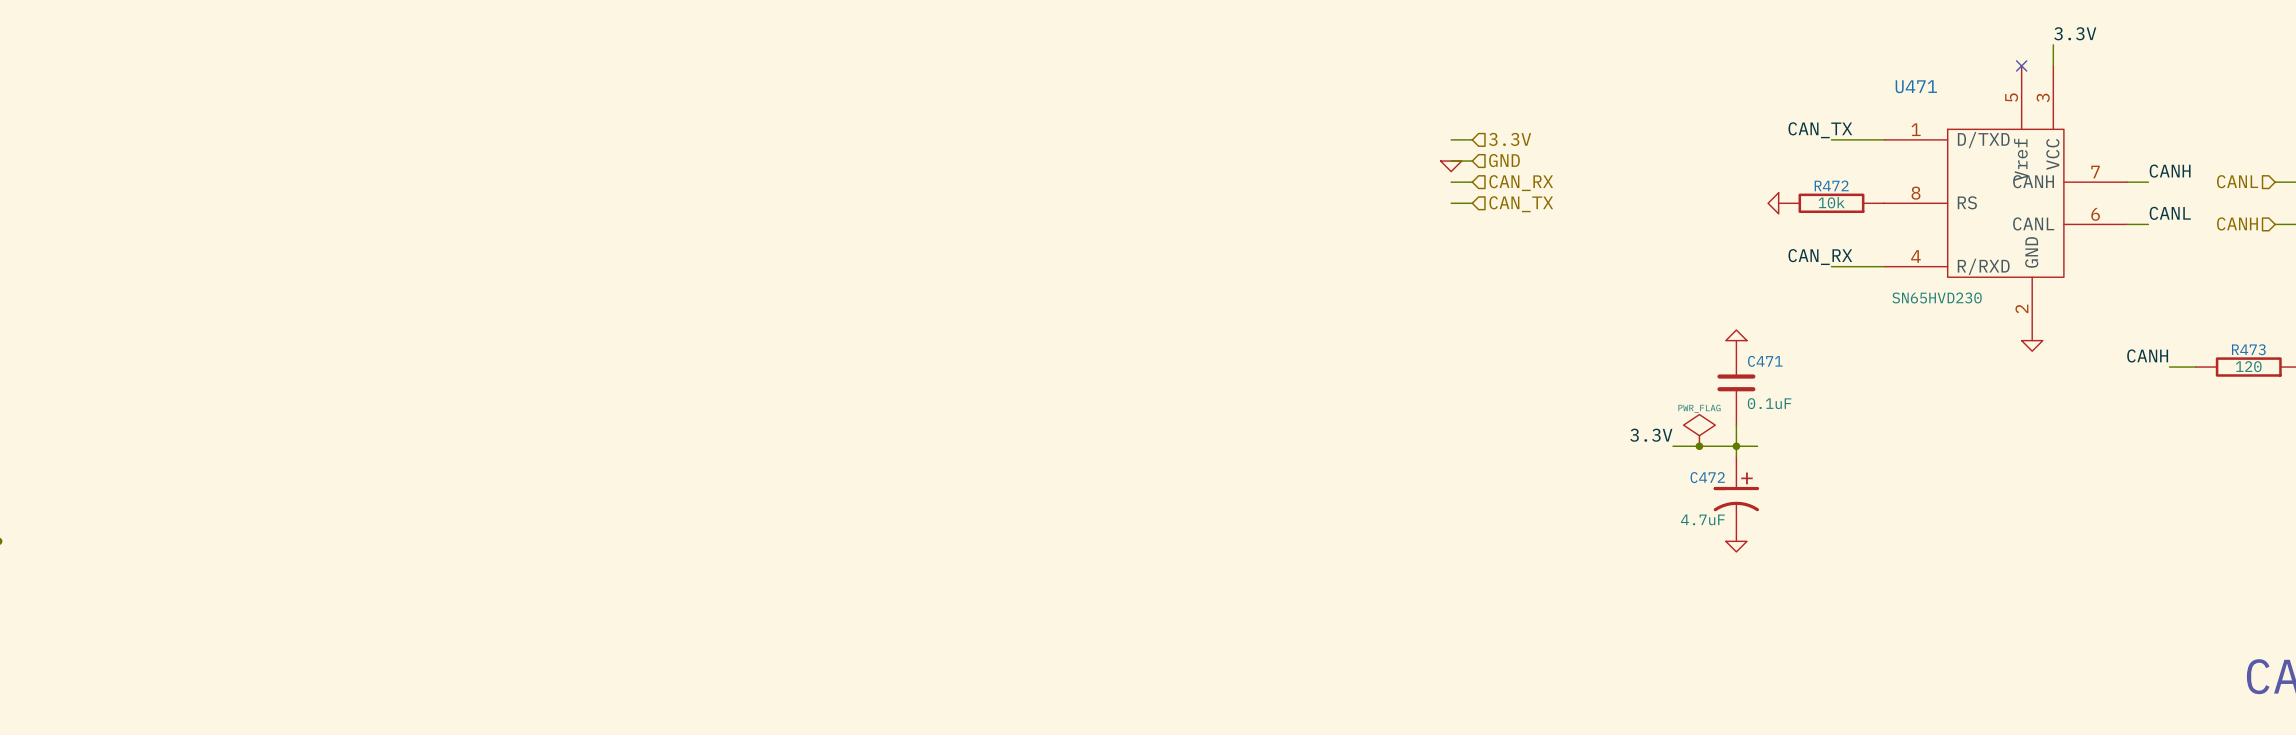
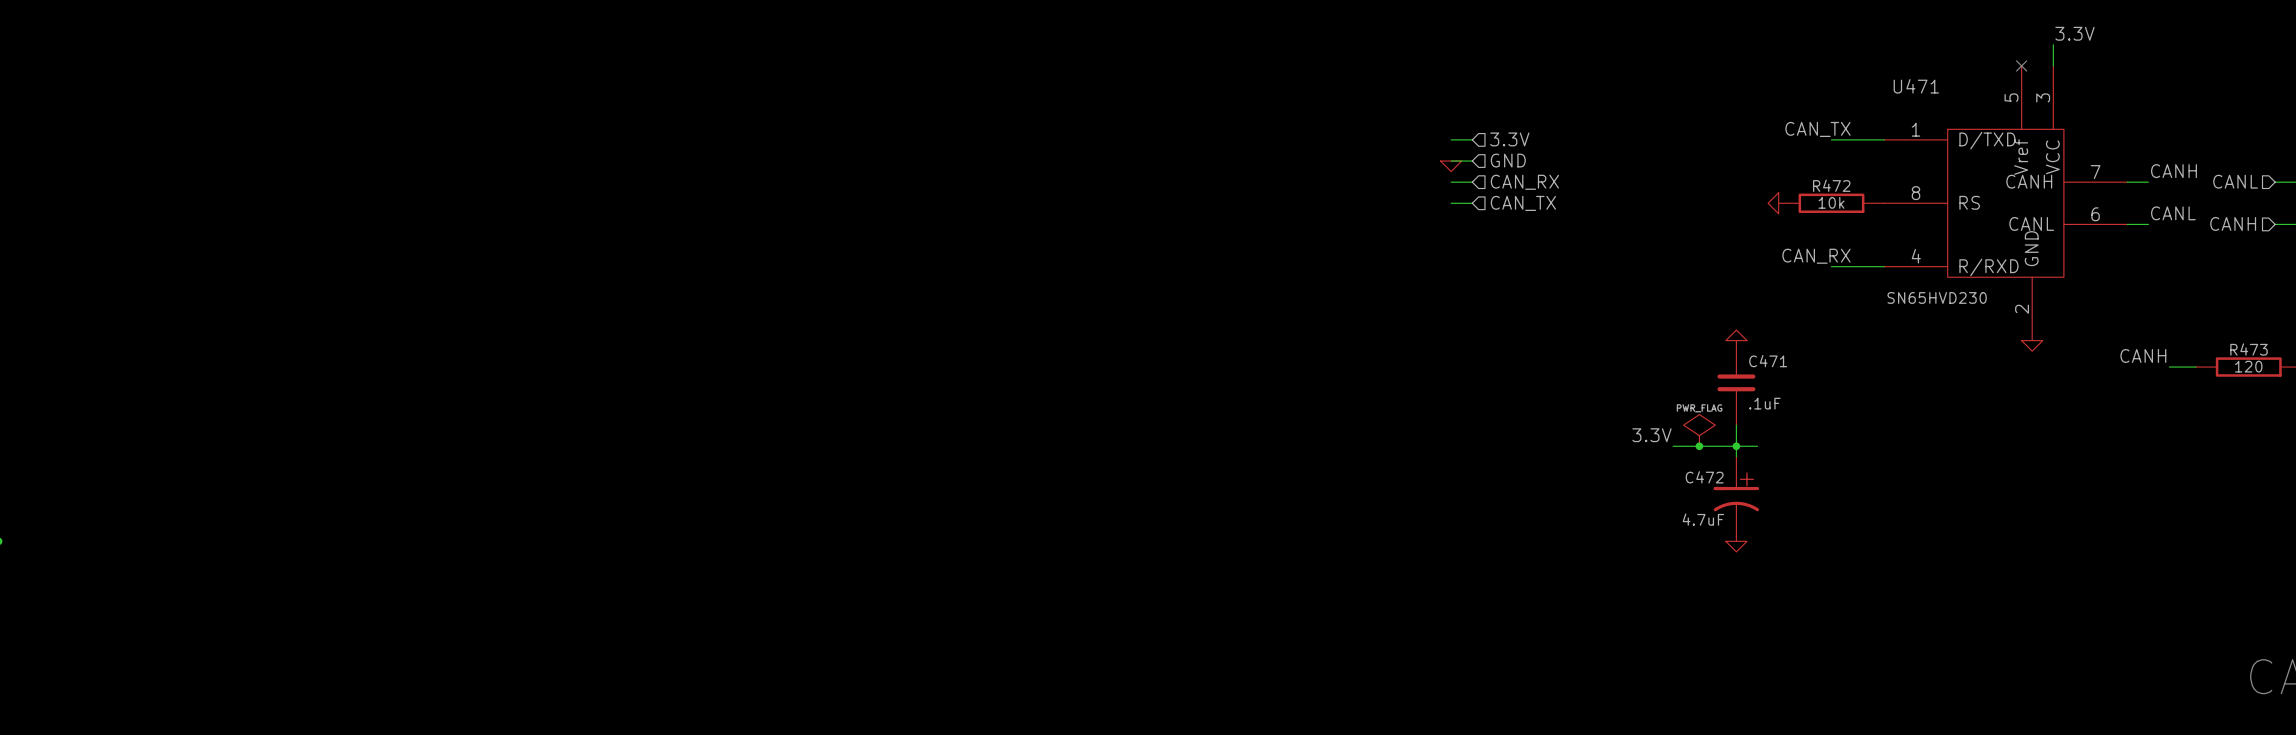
C471 value: 0.1uF (1769, 403) -> .1uF (1764, 403)

